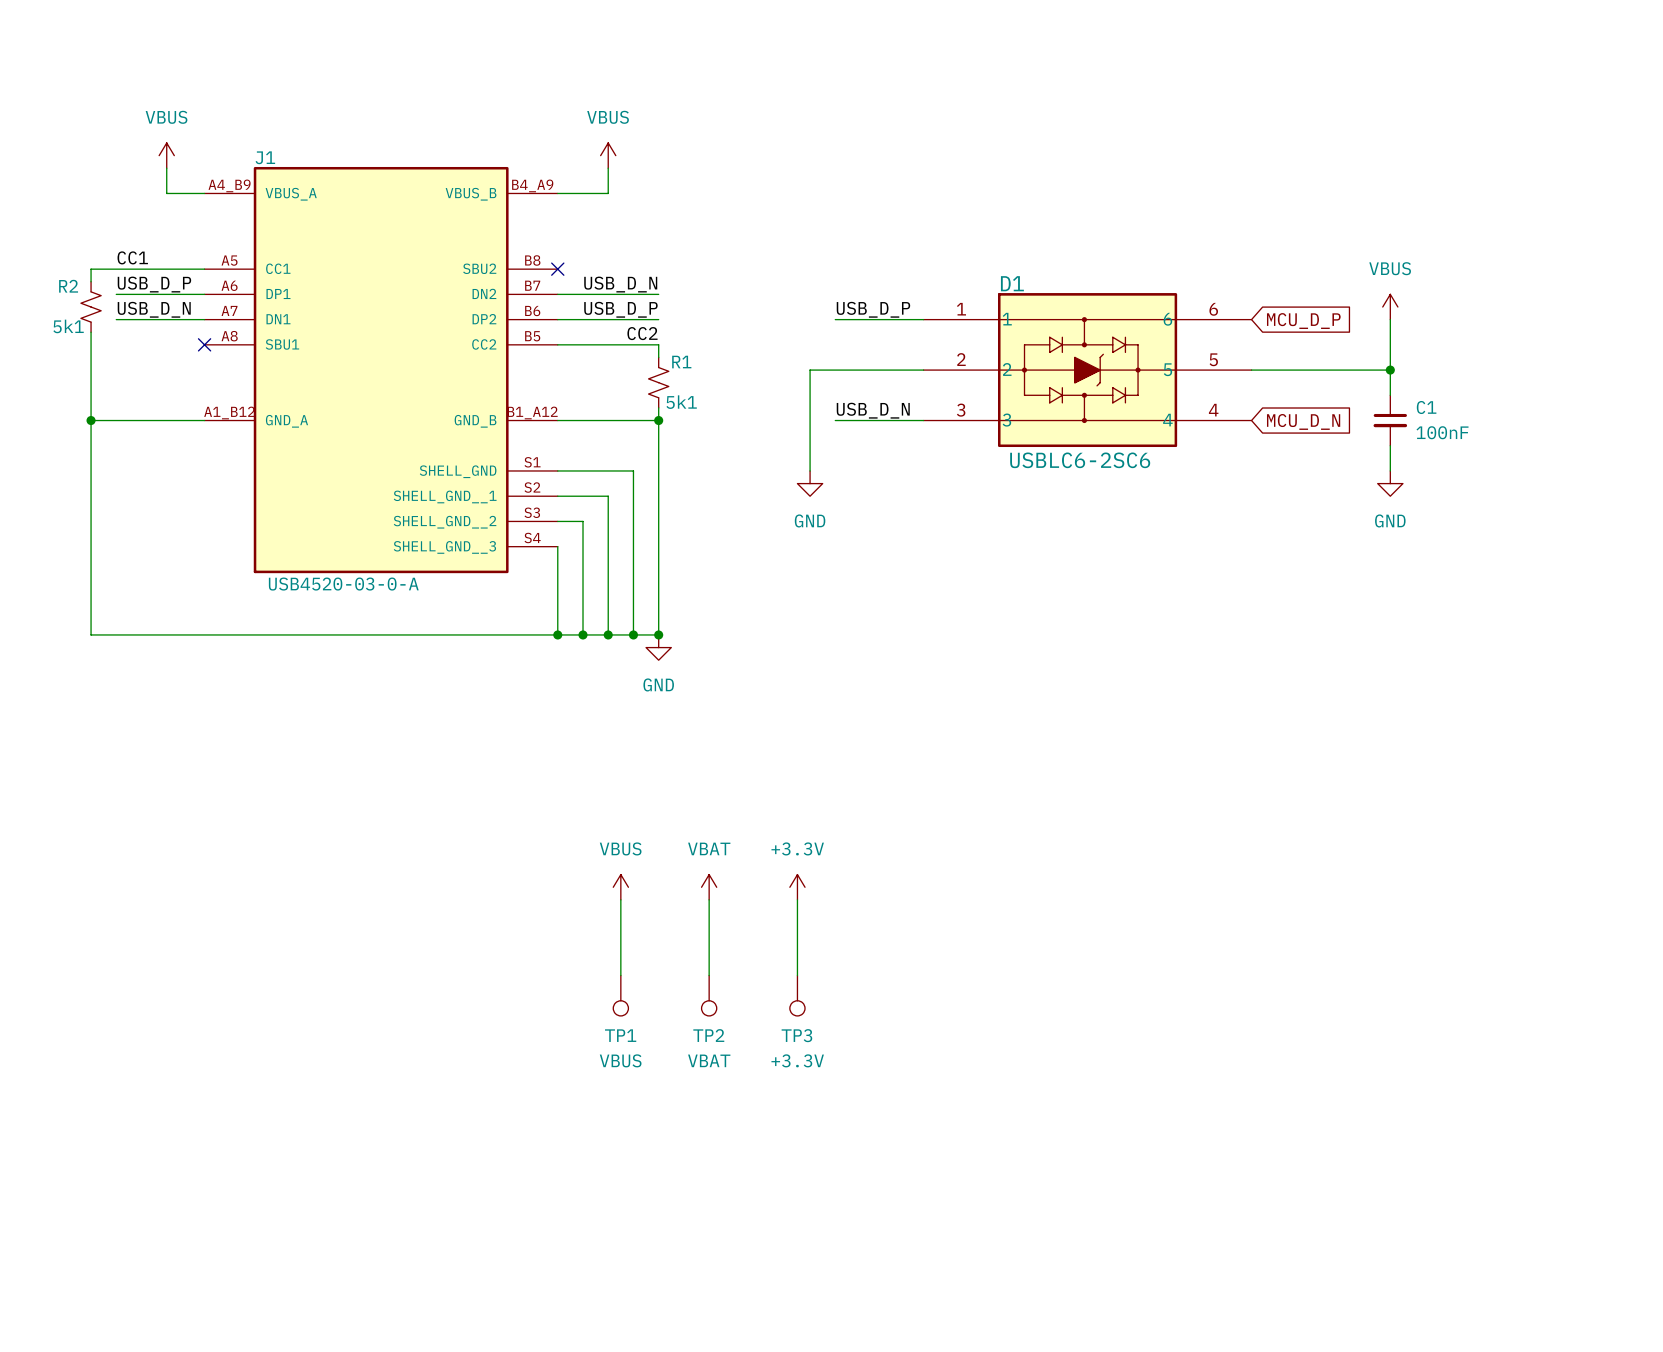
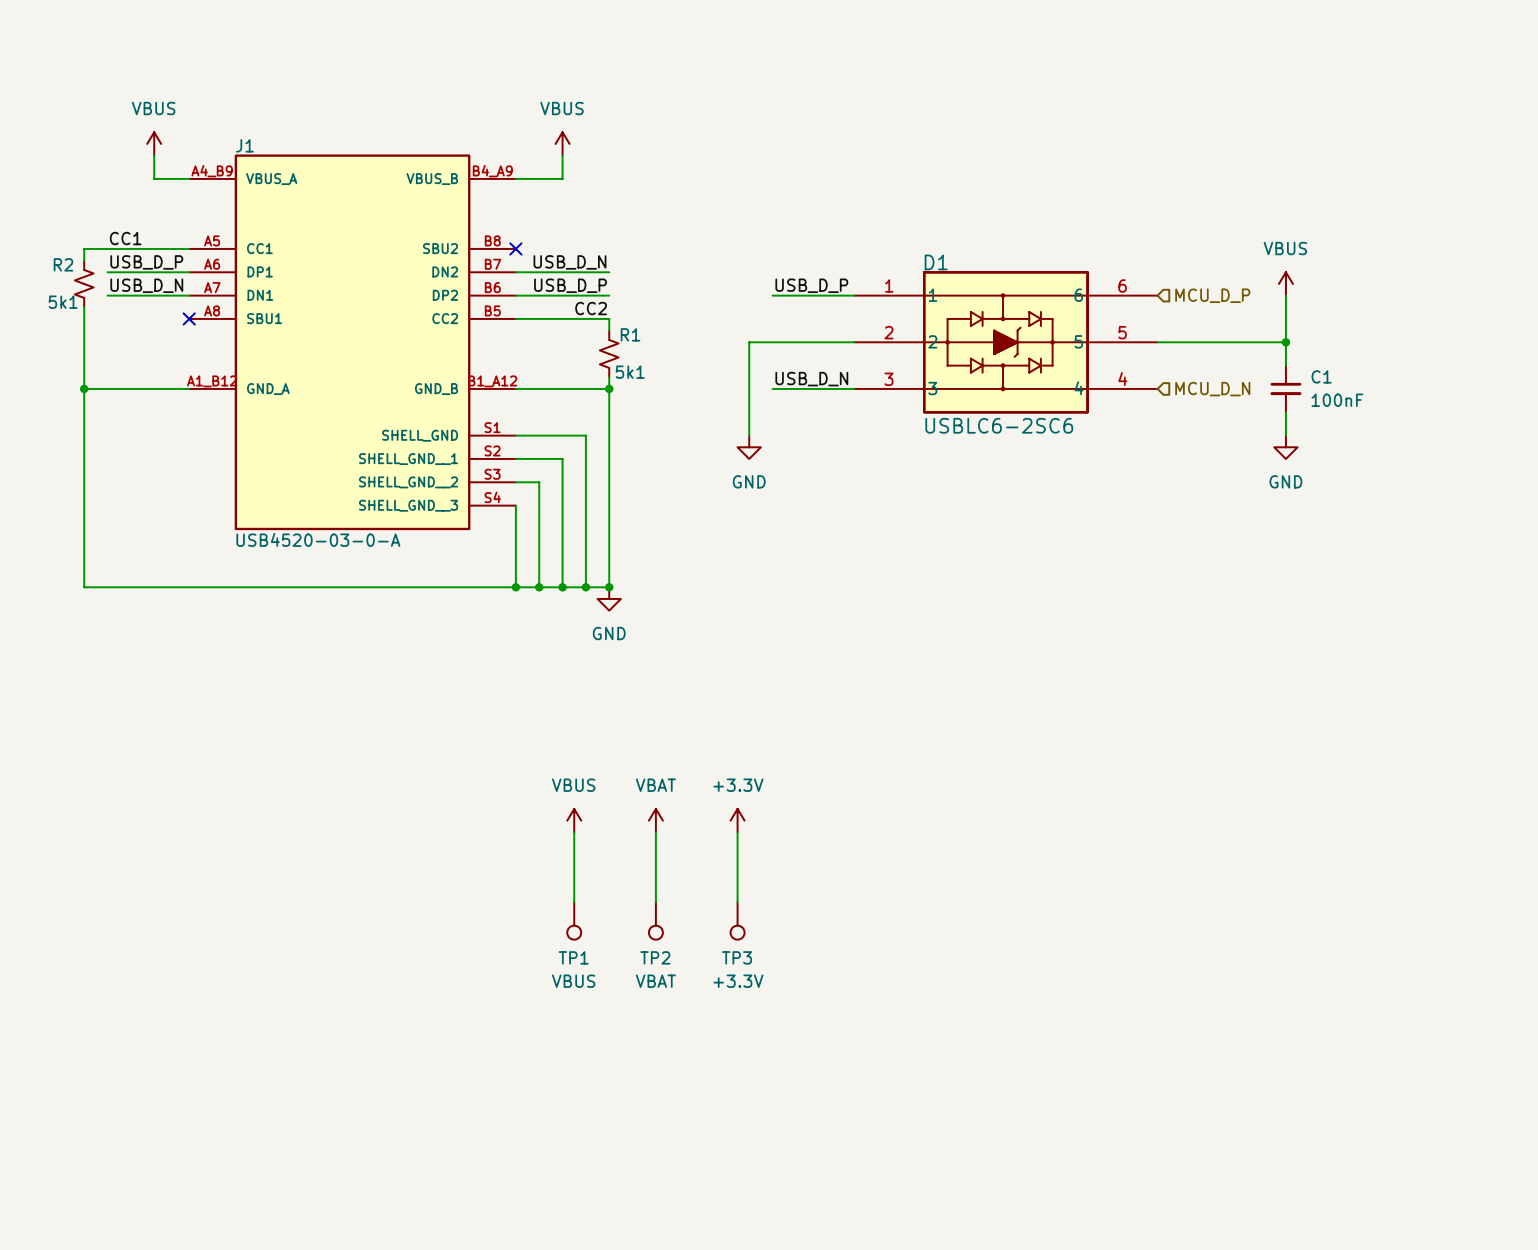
hierarchical label: none -> MCU_D_P (1212, 295)
global label: MCU_D_P (1303, 321) -> none
global label: MCU_D_N (1303, 421) -> none
hierarchical label: none -> MCU_D_N (1212, 389)

